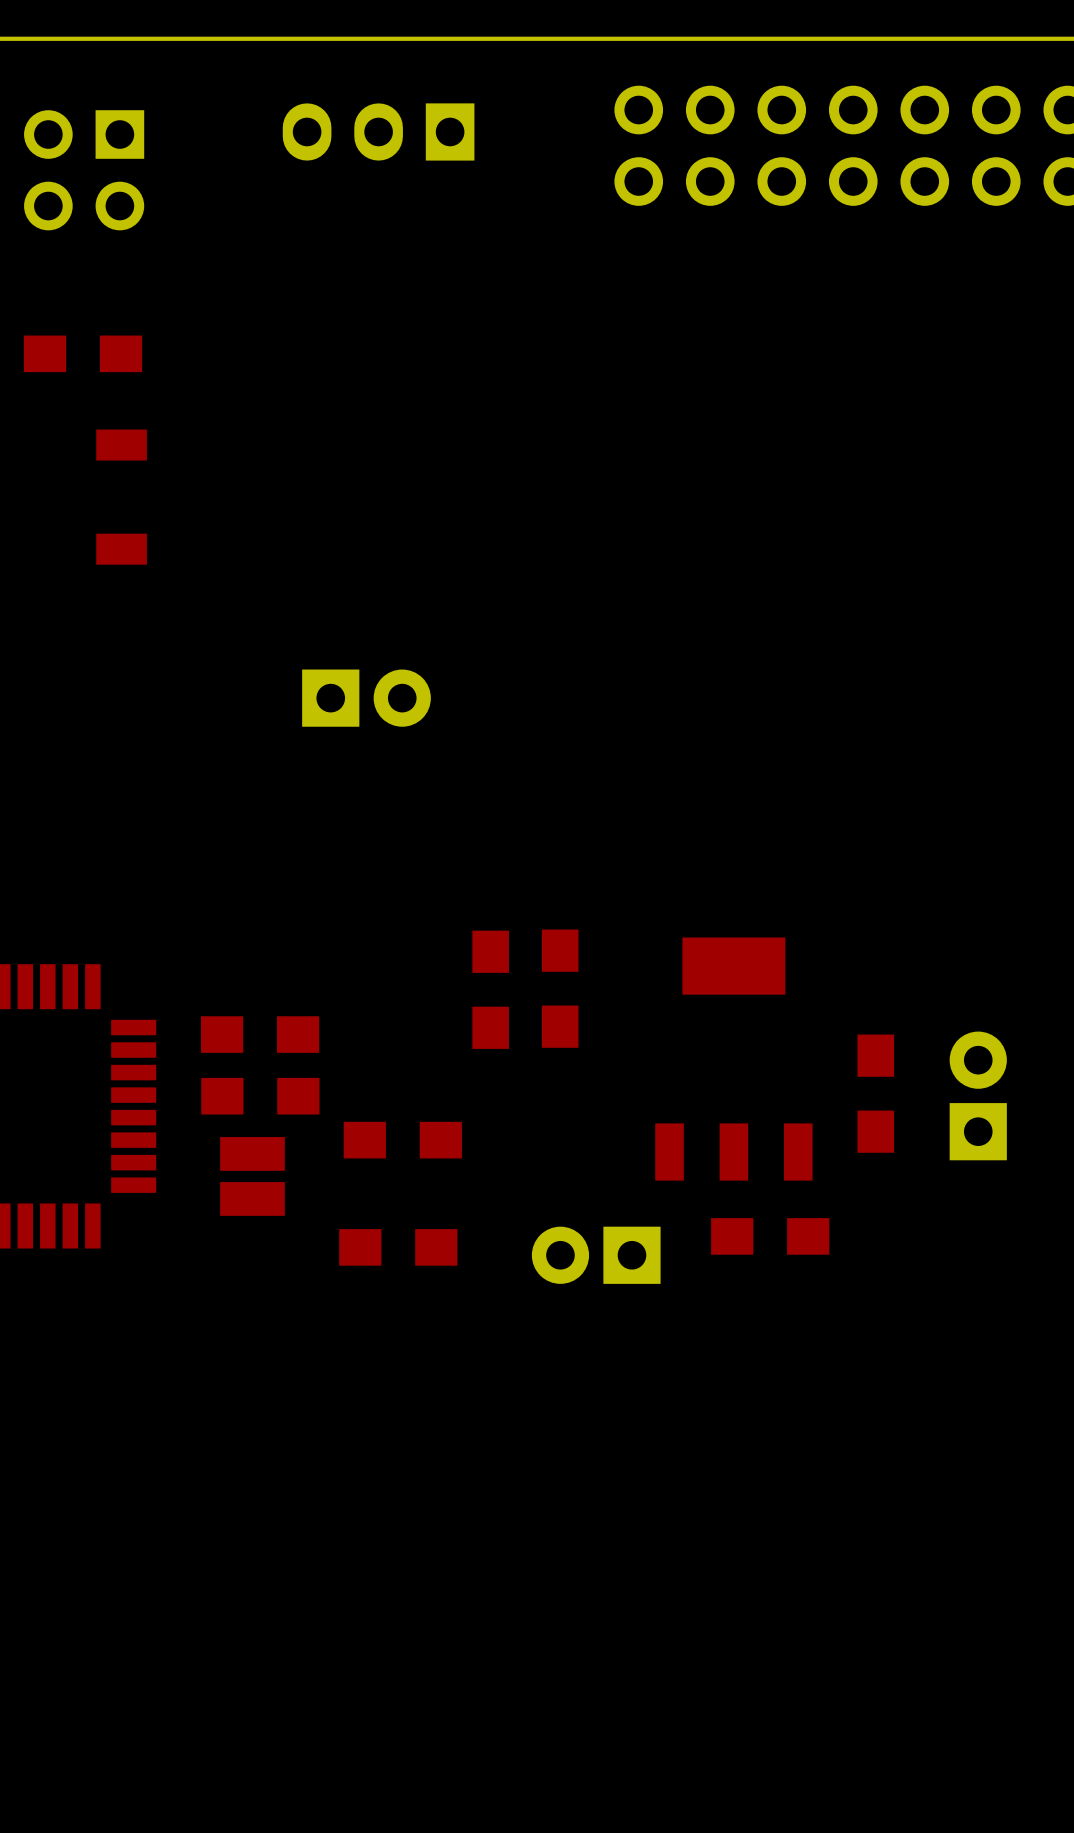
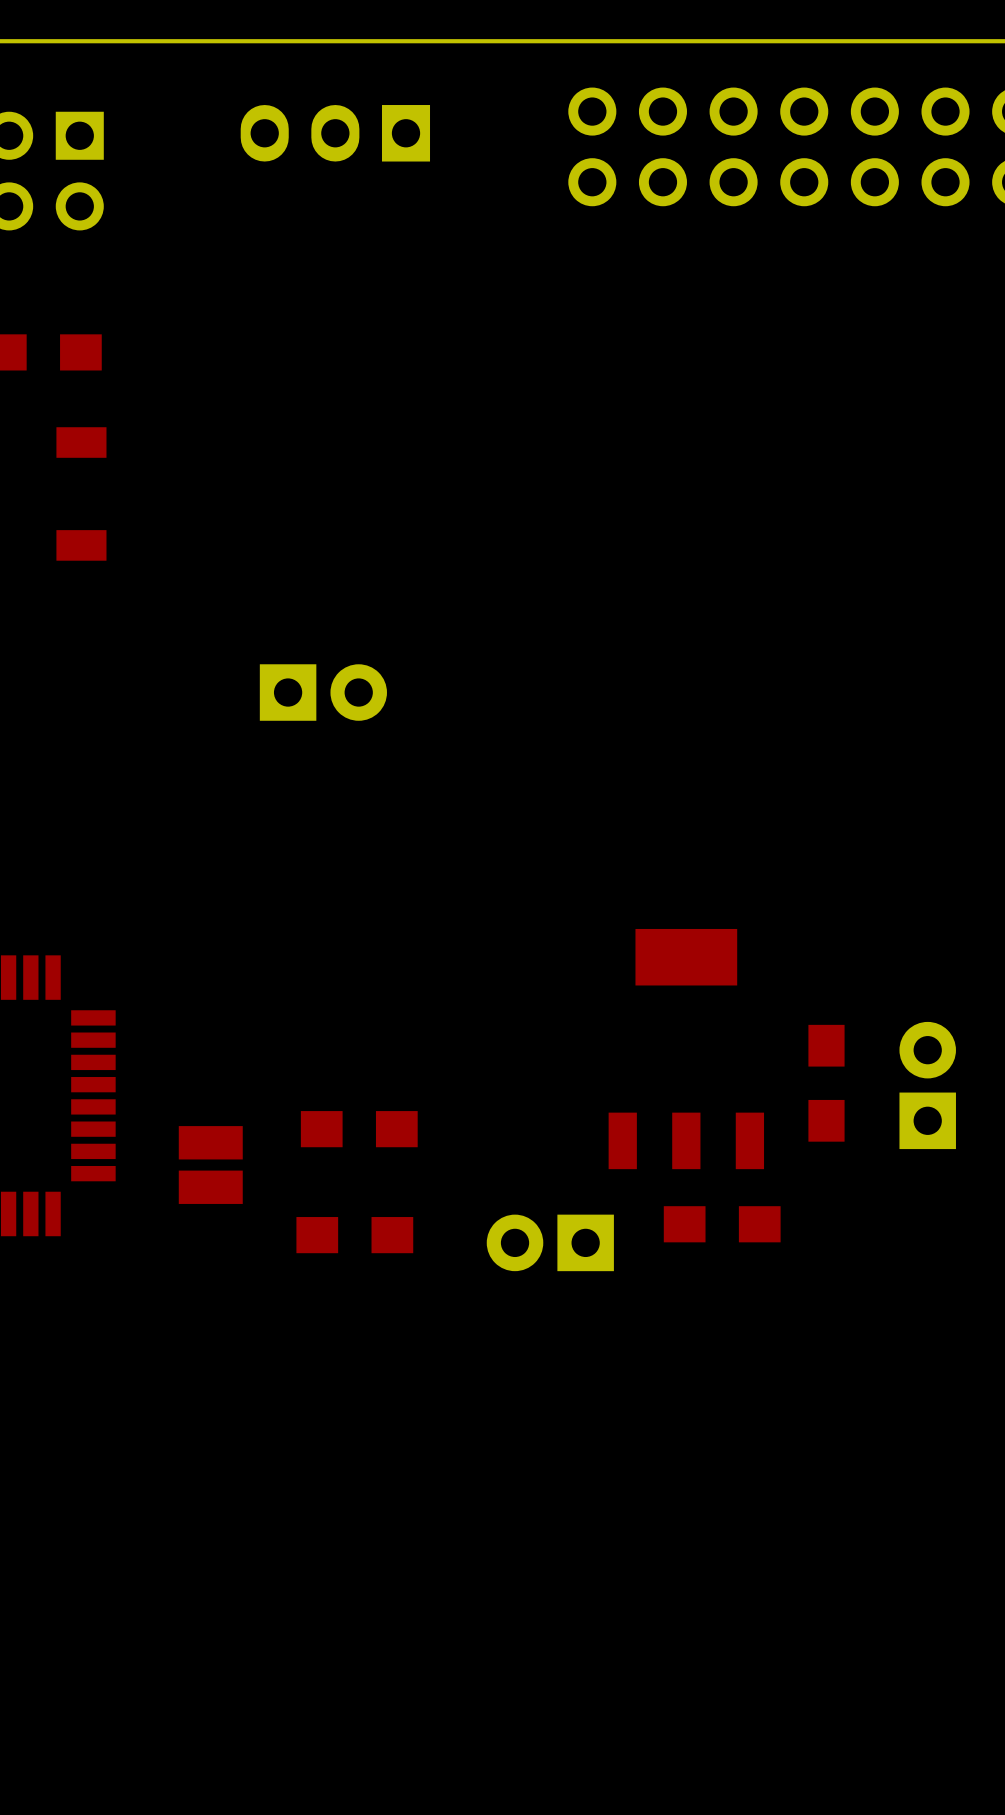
part: (560, 988) -> none
part: (490, 989) -> none
part: (260, 1034) -> none
part: (260, 1096) -> none

